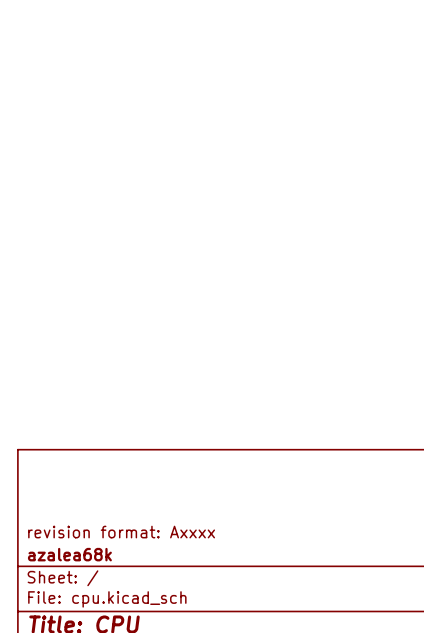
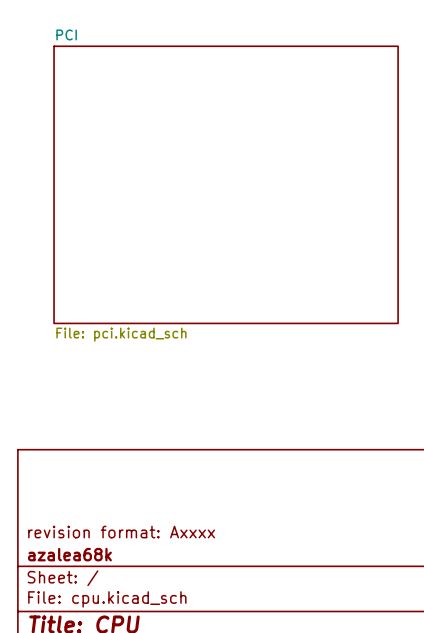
sheet PCI: none -> File: pci.kicad_sch (226, 184)

